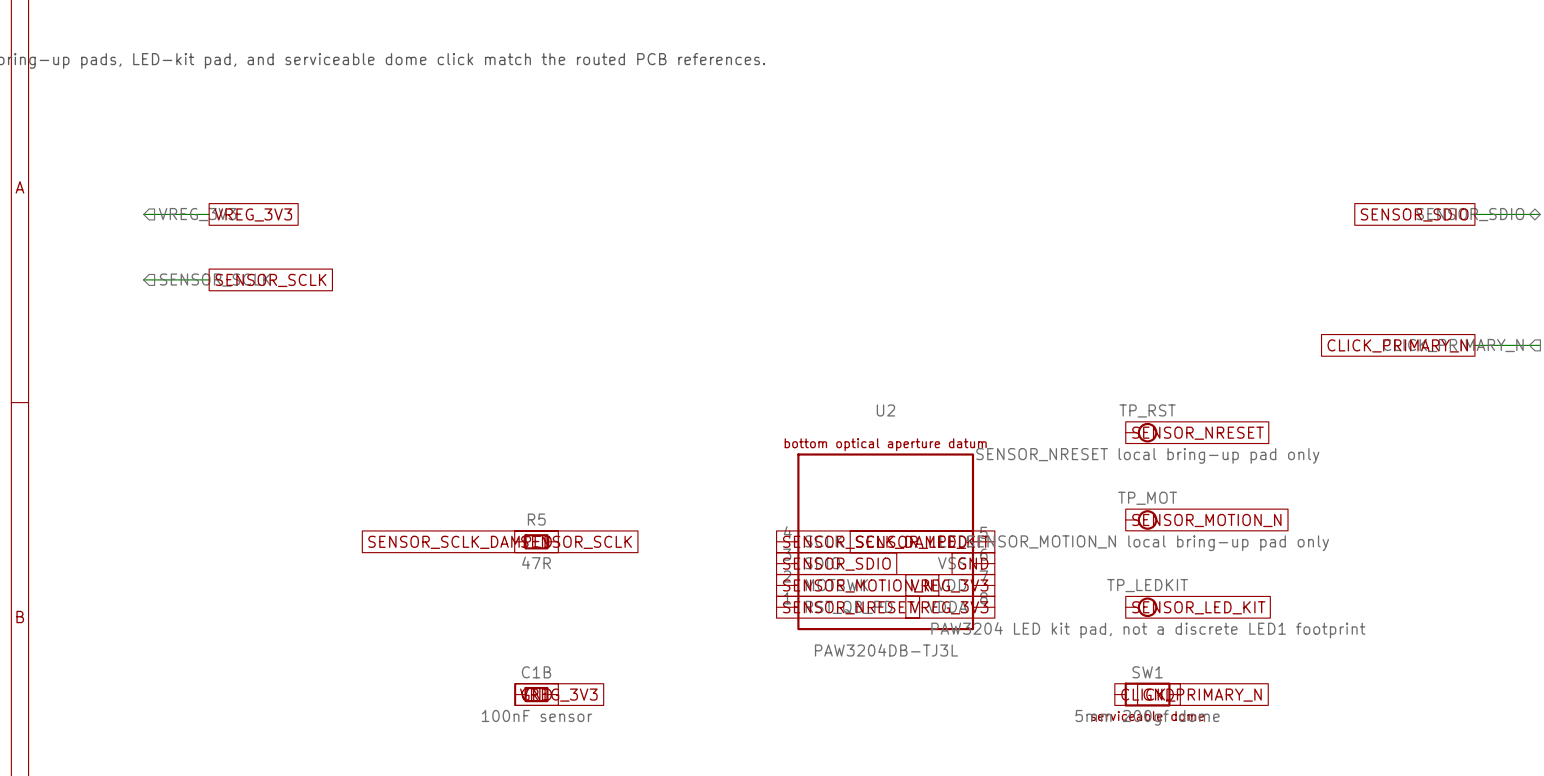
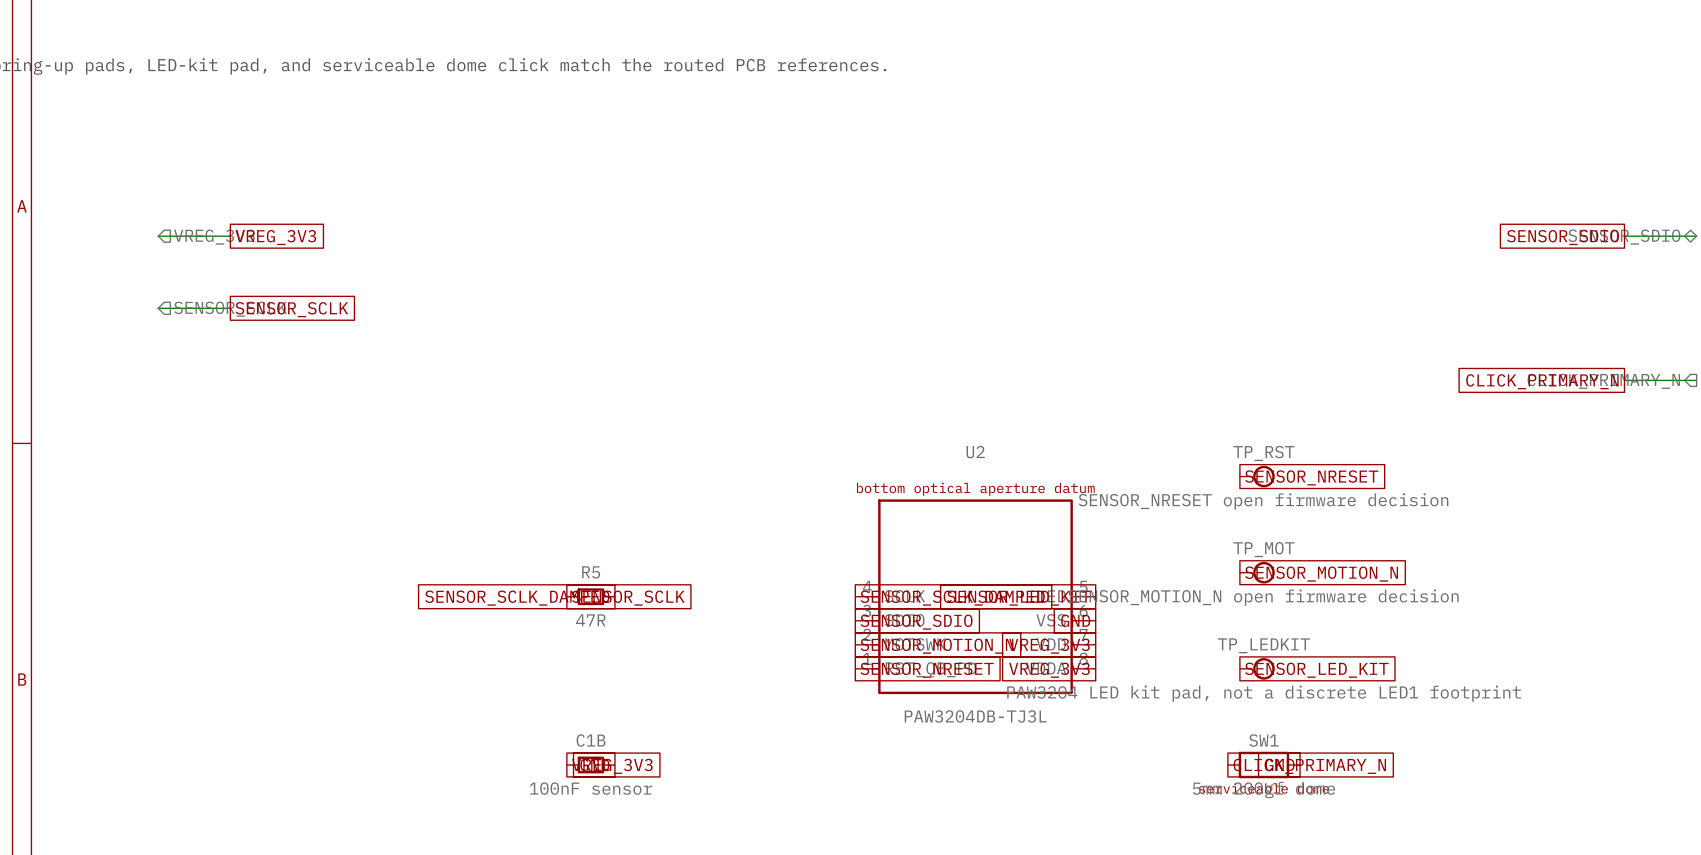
TP_RST value: SENSOR_NRESET local bring-up pad only (1147, 455) -> SENSOR_NRESET open firmware decision (1263, 501)
TP_MOT value: SENSOR_MOTION_N local bring-up pad only (1147, 543) -> SENSOR_MOTION_N open firmware decision (1263, 597)

